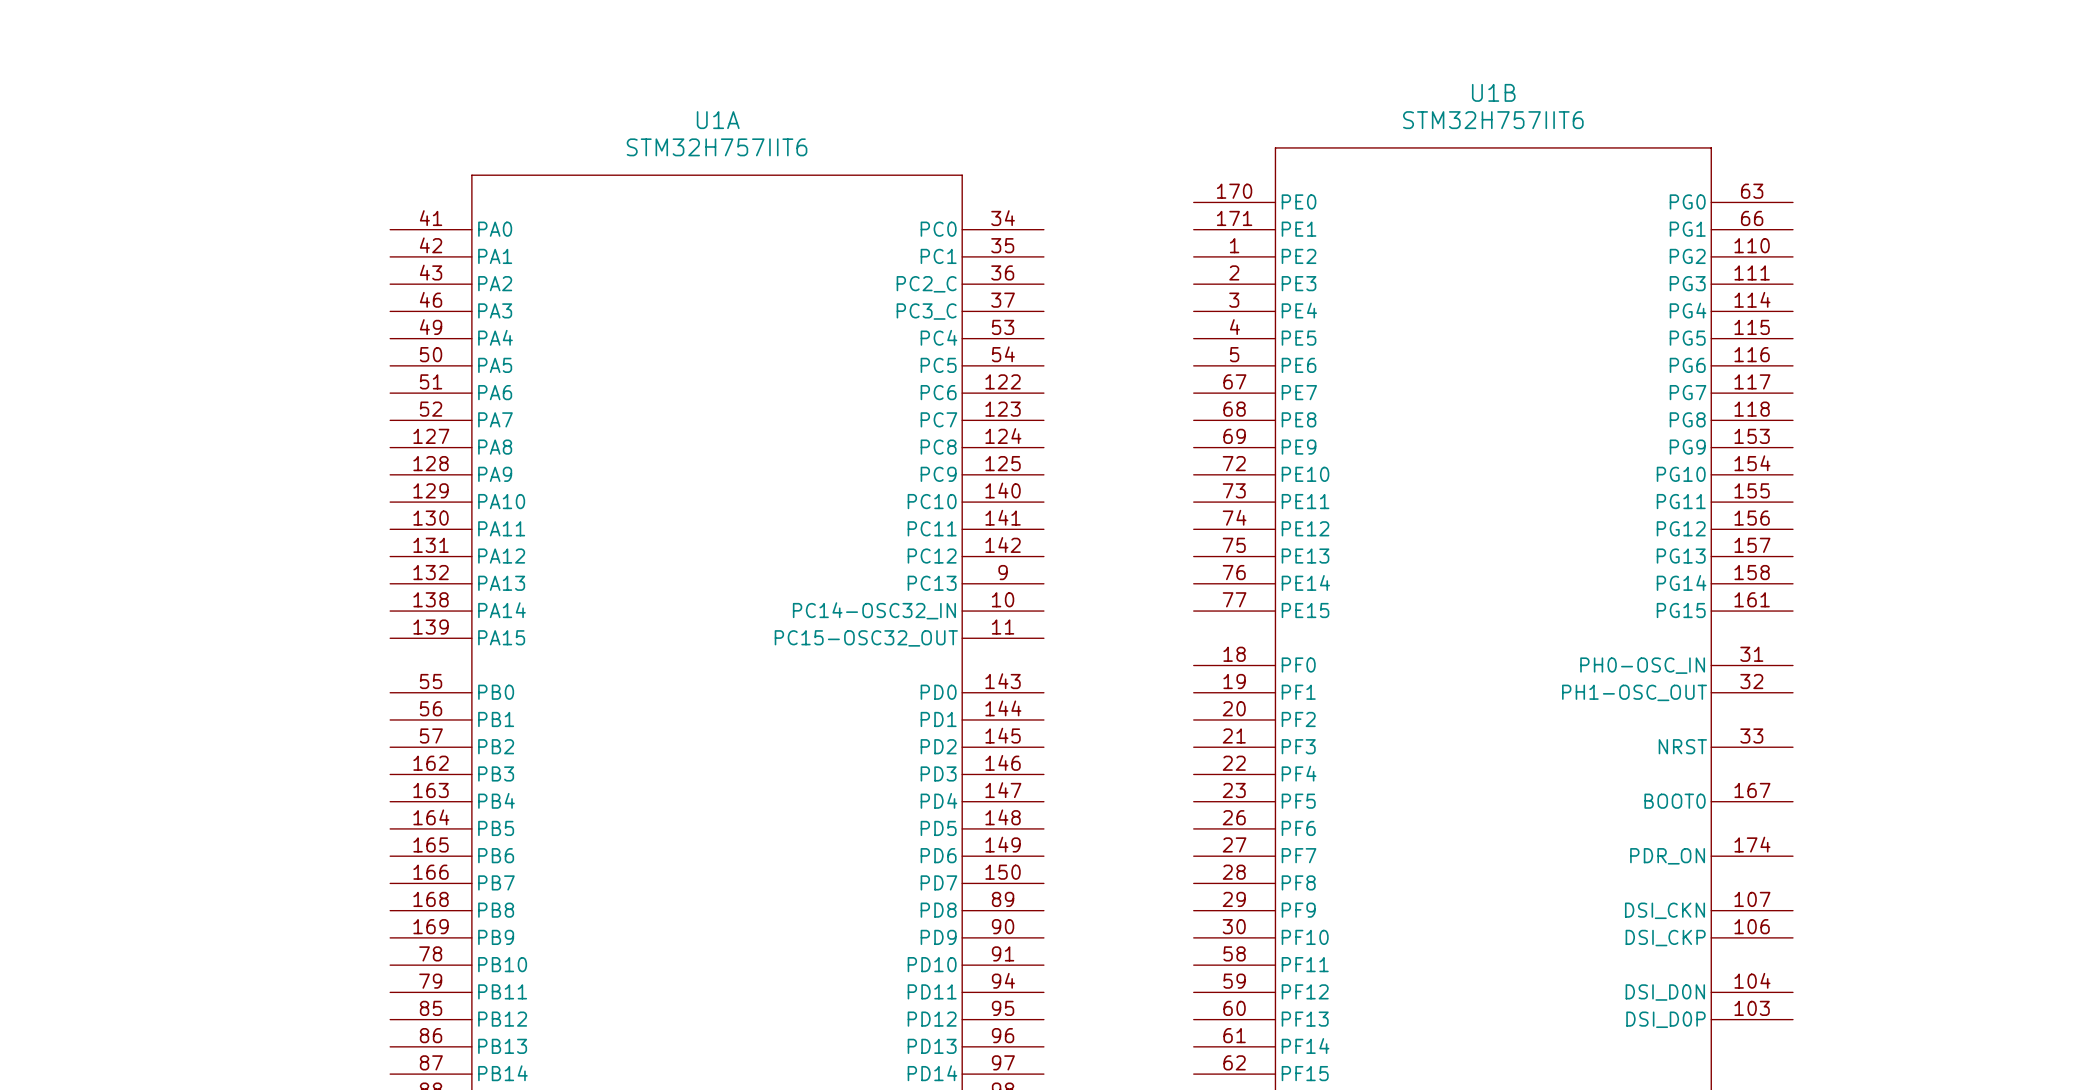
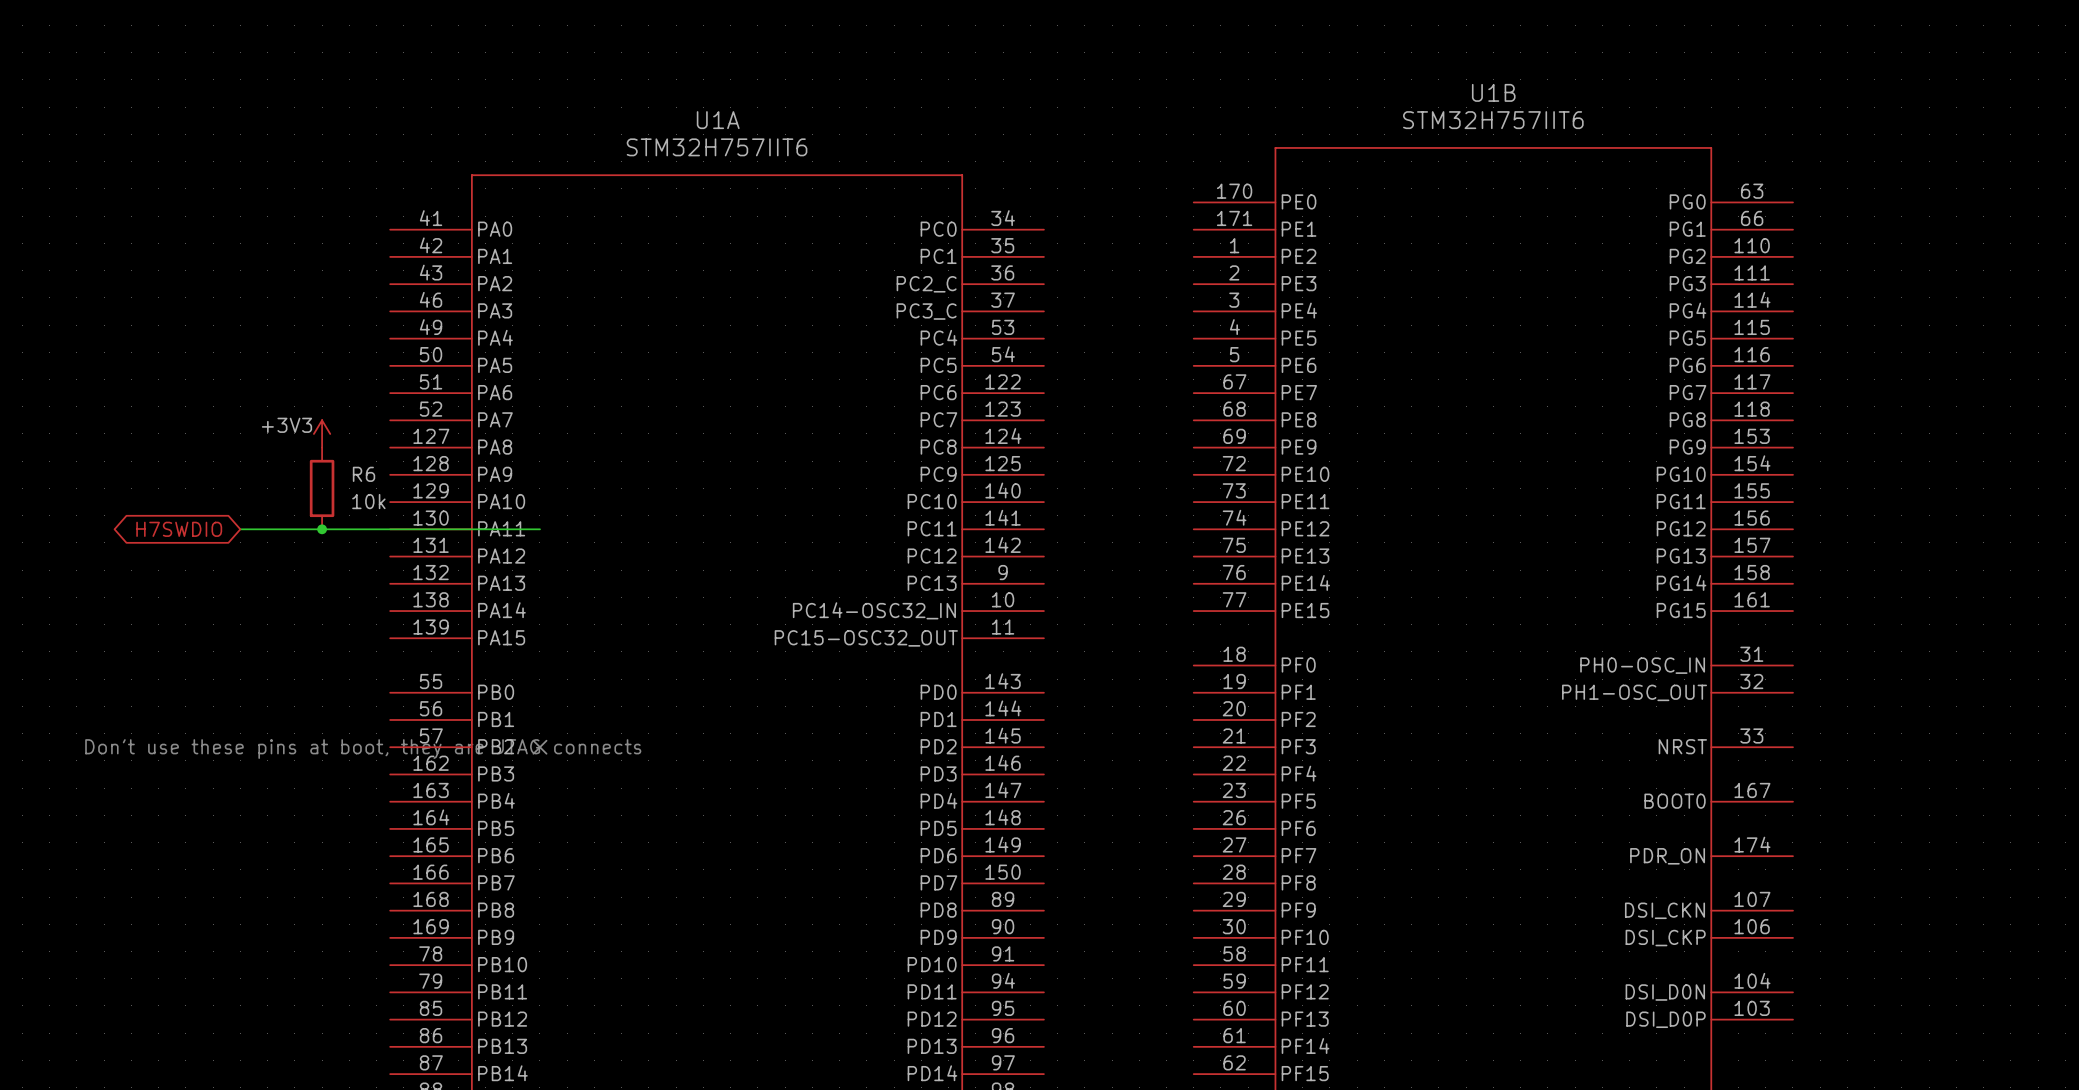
power symbol: none -> +3V3 (322, 433)
R6: none -> 10k (322, 488)
global label: none -> H7SWDIO (179, 529)
wire: none -> (240, 529) (539, 529)
junction: none -> (322, 529)
no-connect mark: none -> (539, 747)
text: none -> Don't use these pins at boot, they are JTAG connects (363, 749)

